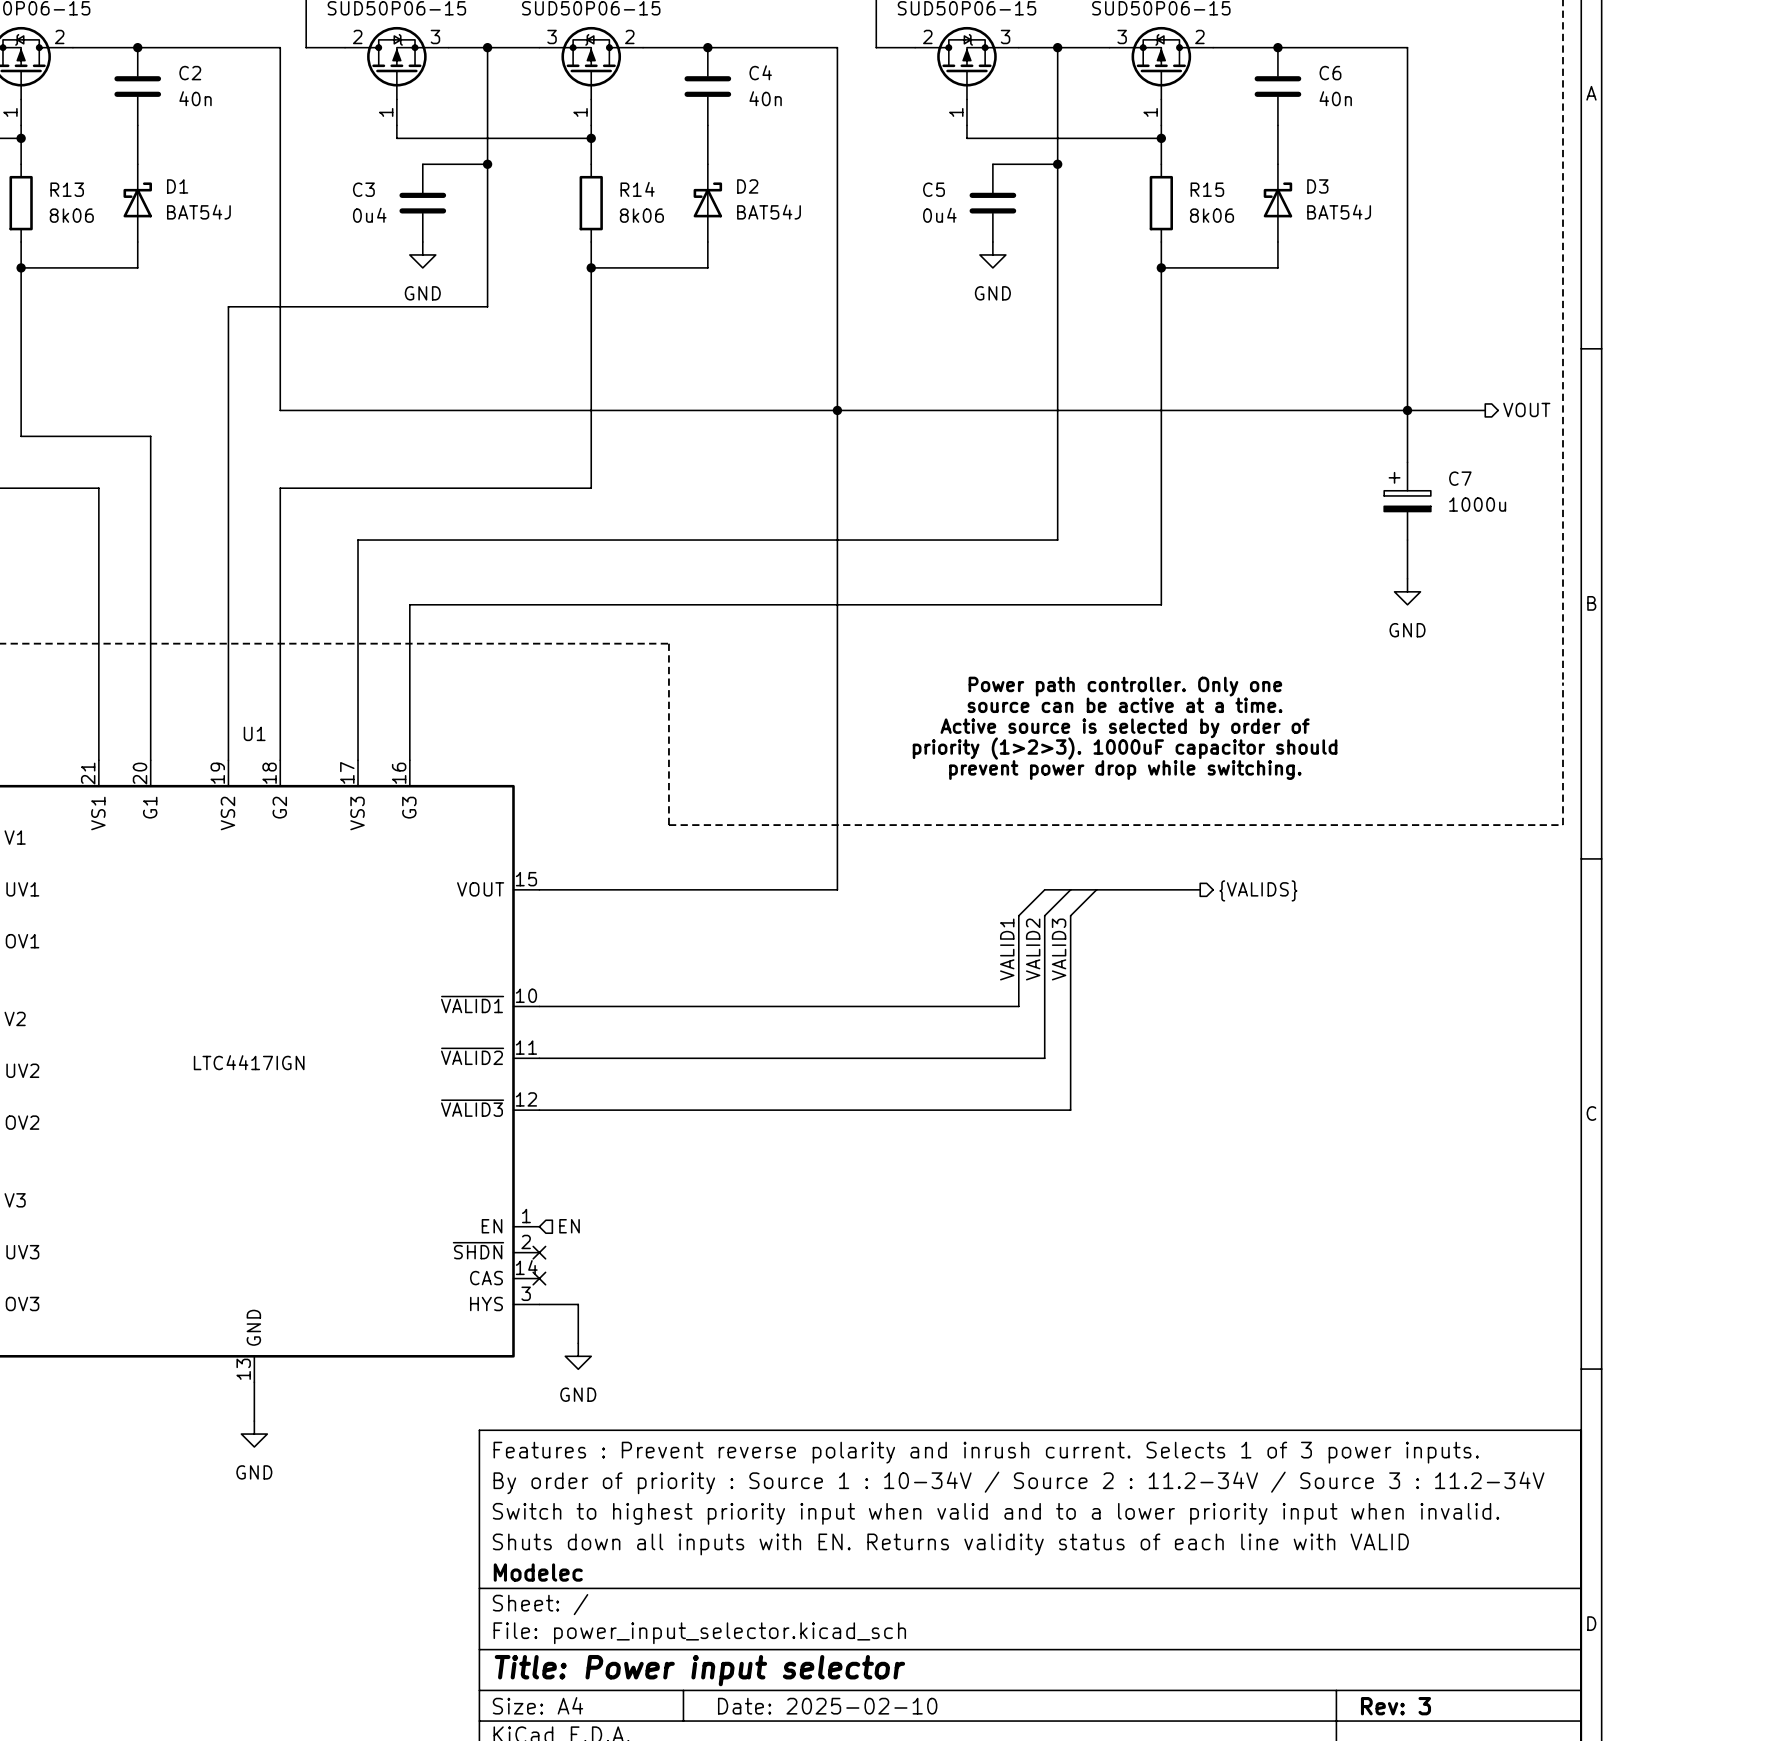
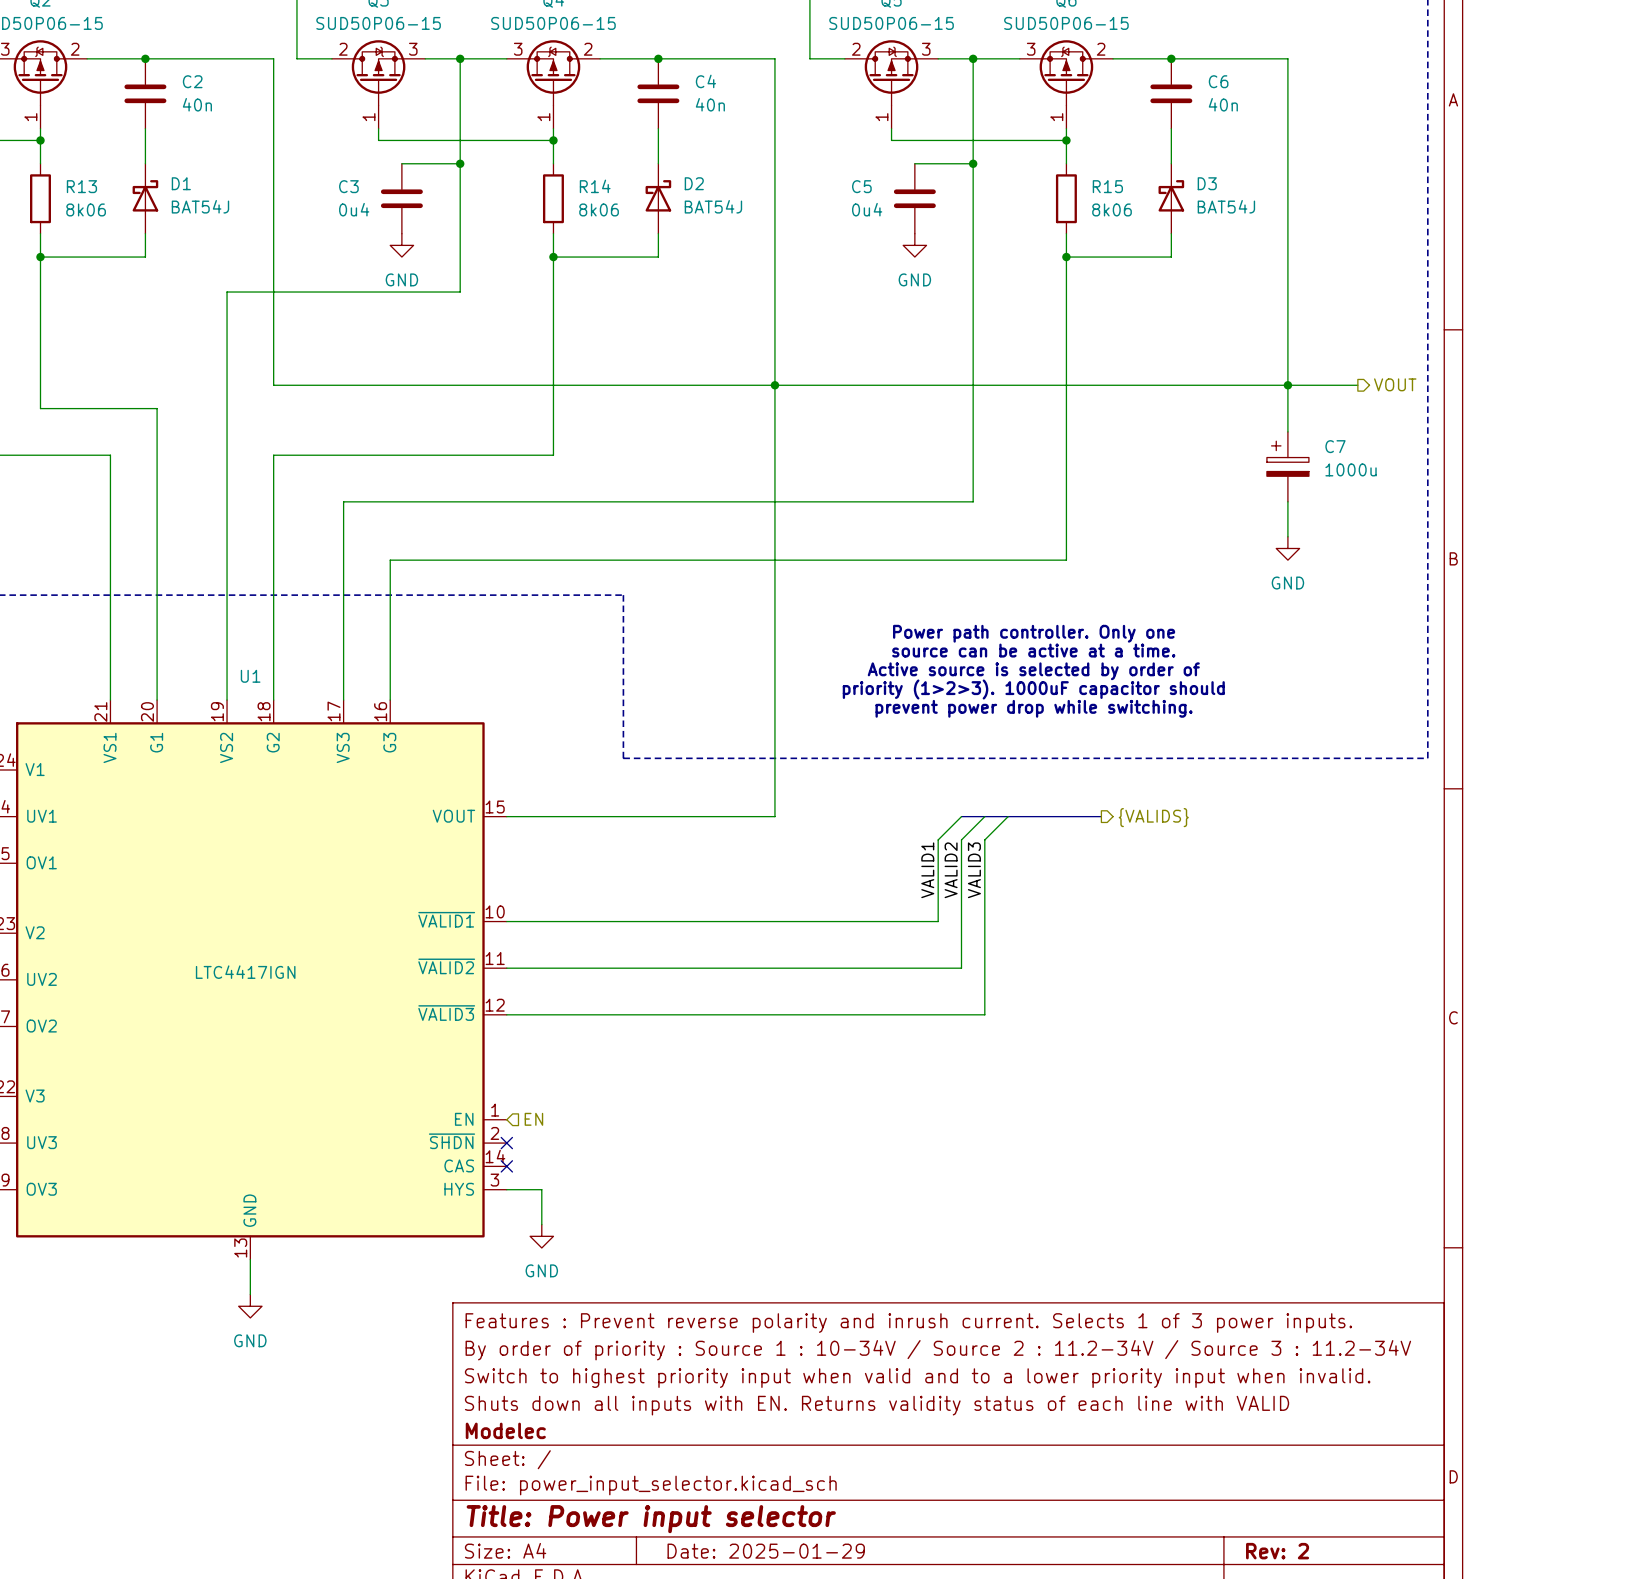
title block: Date: 2025-02-10 (827, 1706) -> Date: 2025-01-29 (766, 1551)
title block: Rev: 3 (1395, 1706) -> Rev: 2 (1277, 1551)

